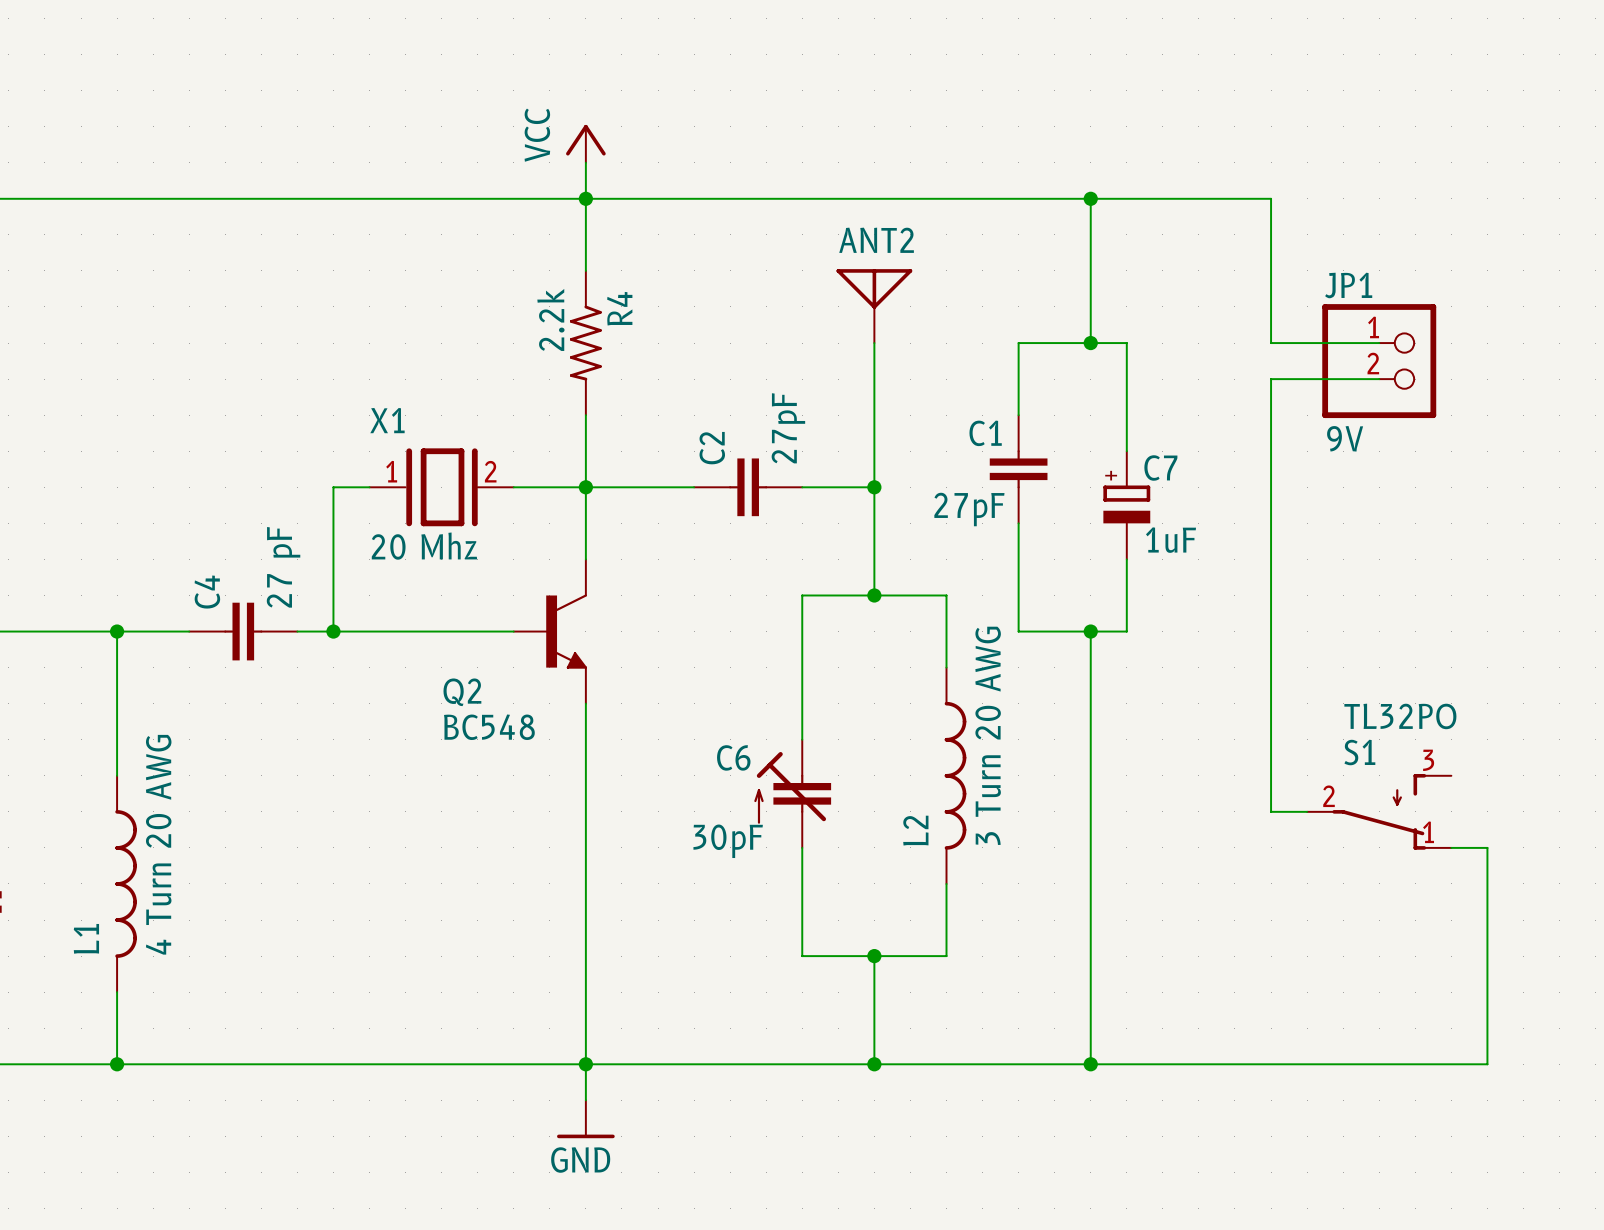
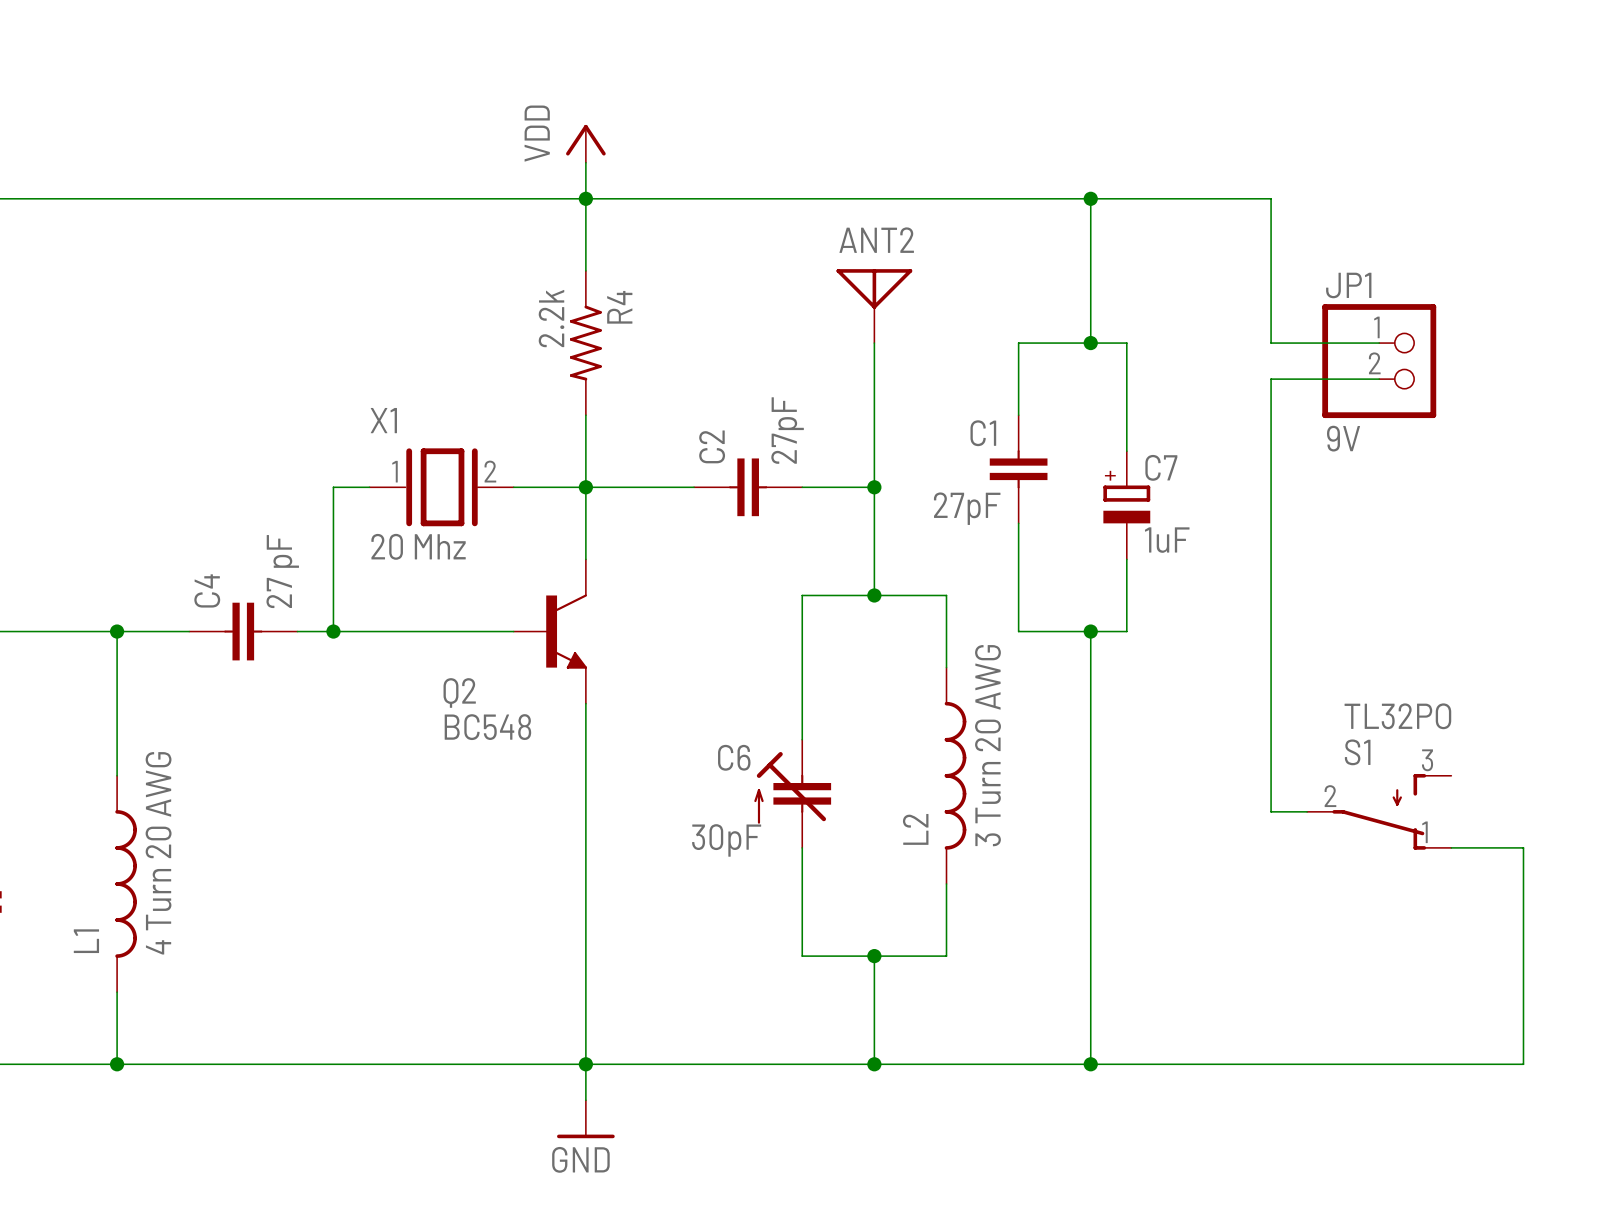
power symbol: VCC (585, 143) -> VDD (585, 143)
wire: (1487, 847) (1487, 1064) -> (1487, 847) (1523, 847) (1523, 1064) (1487, 1064)

